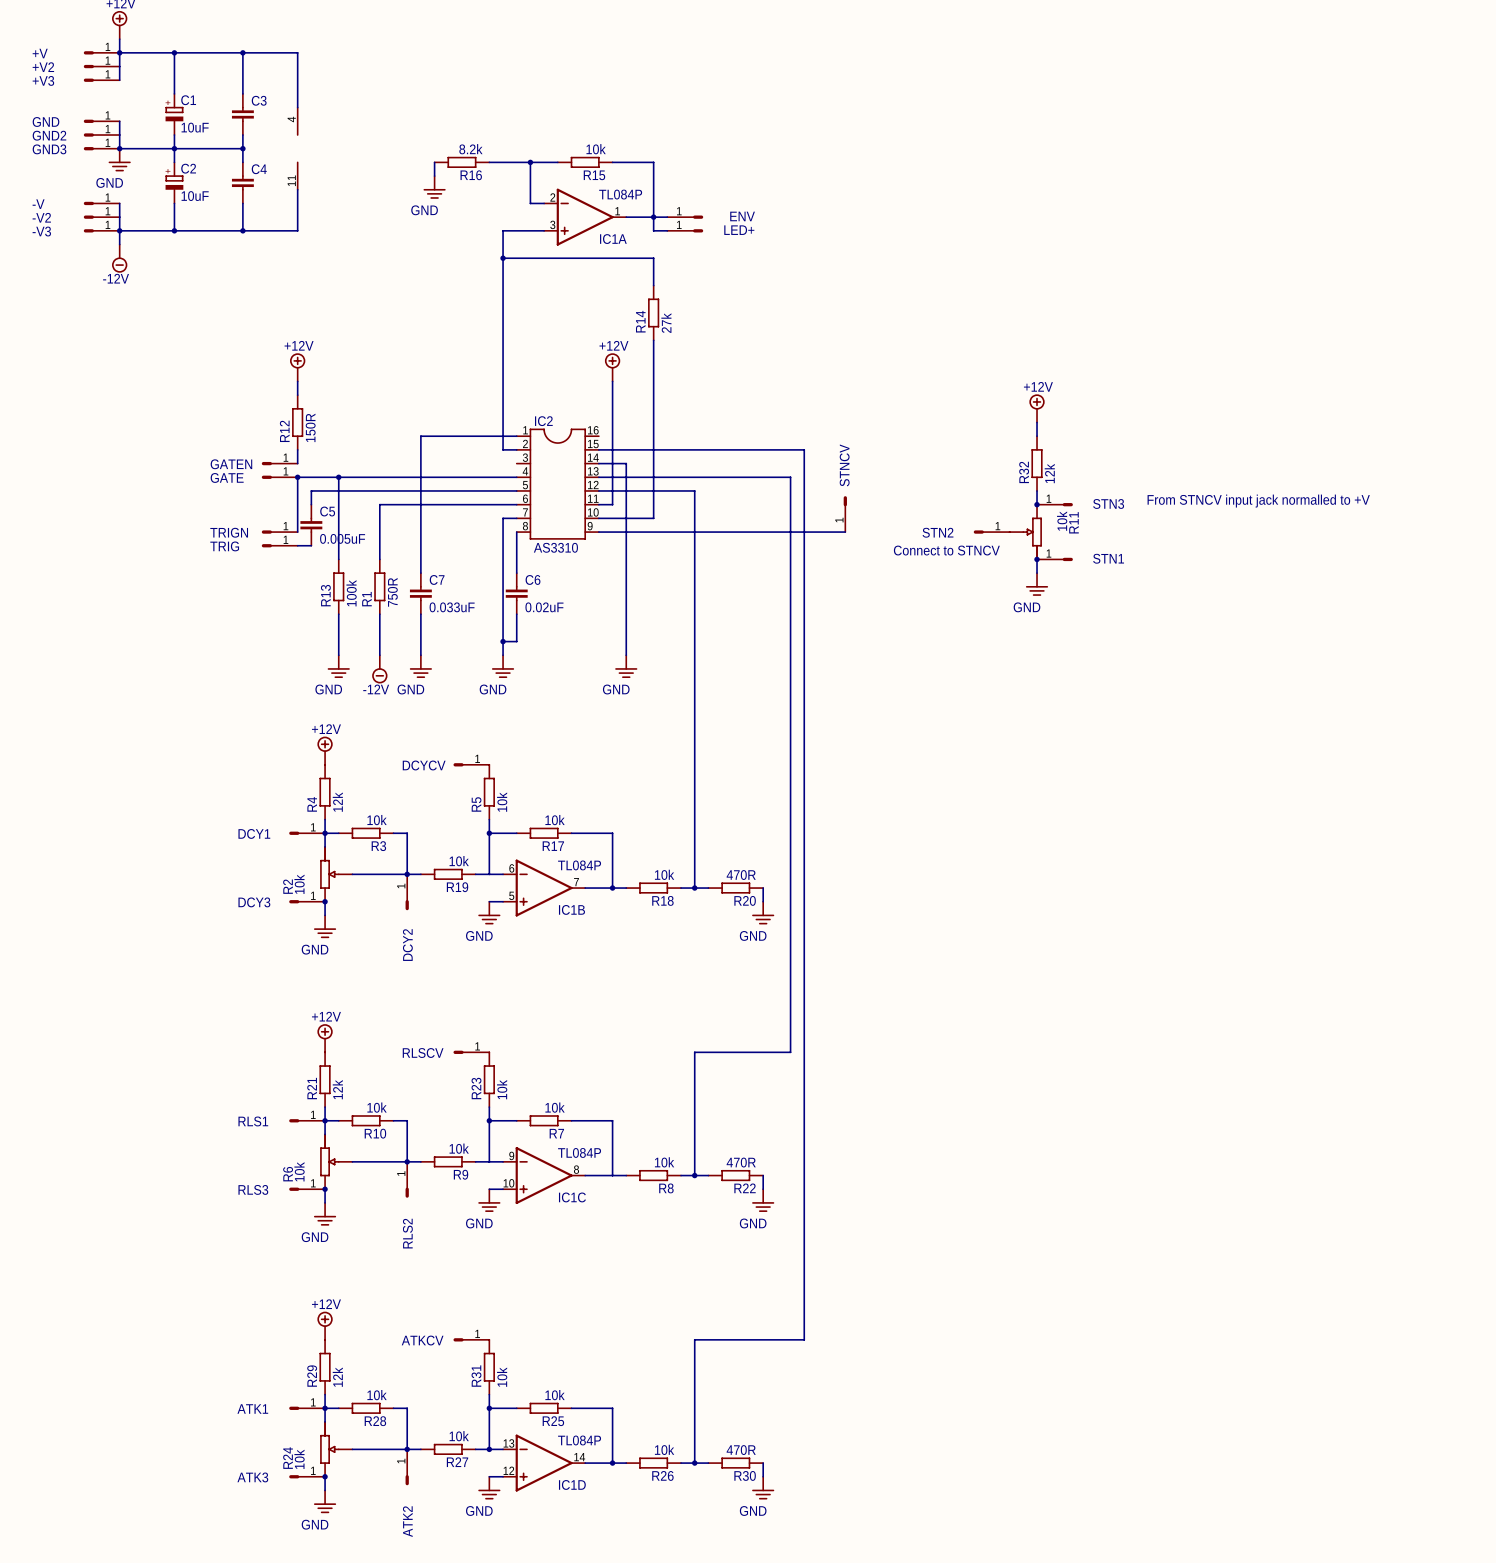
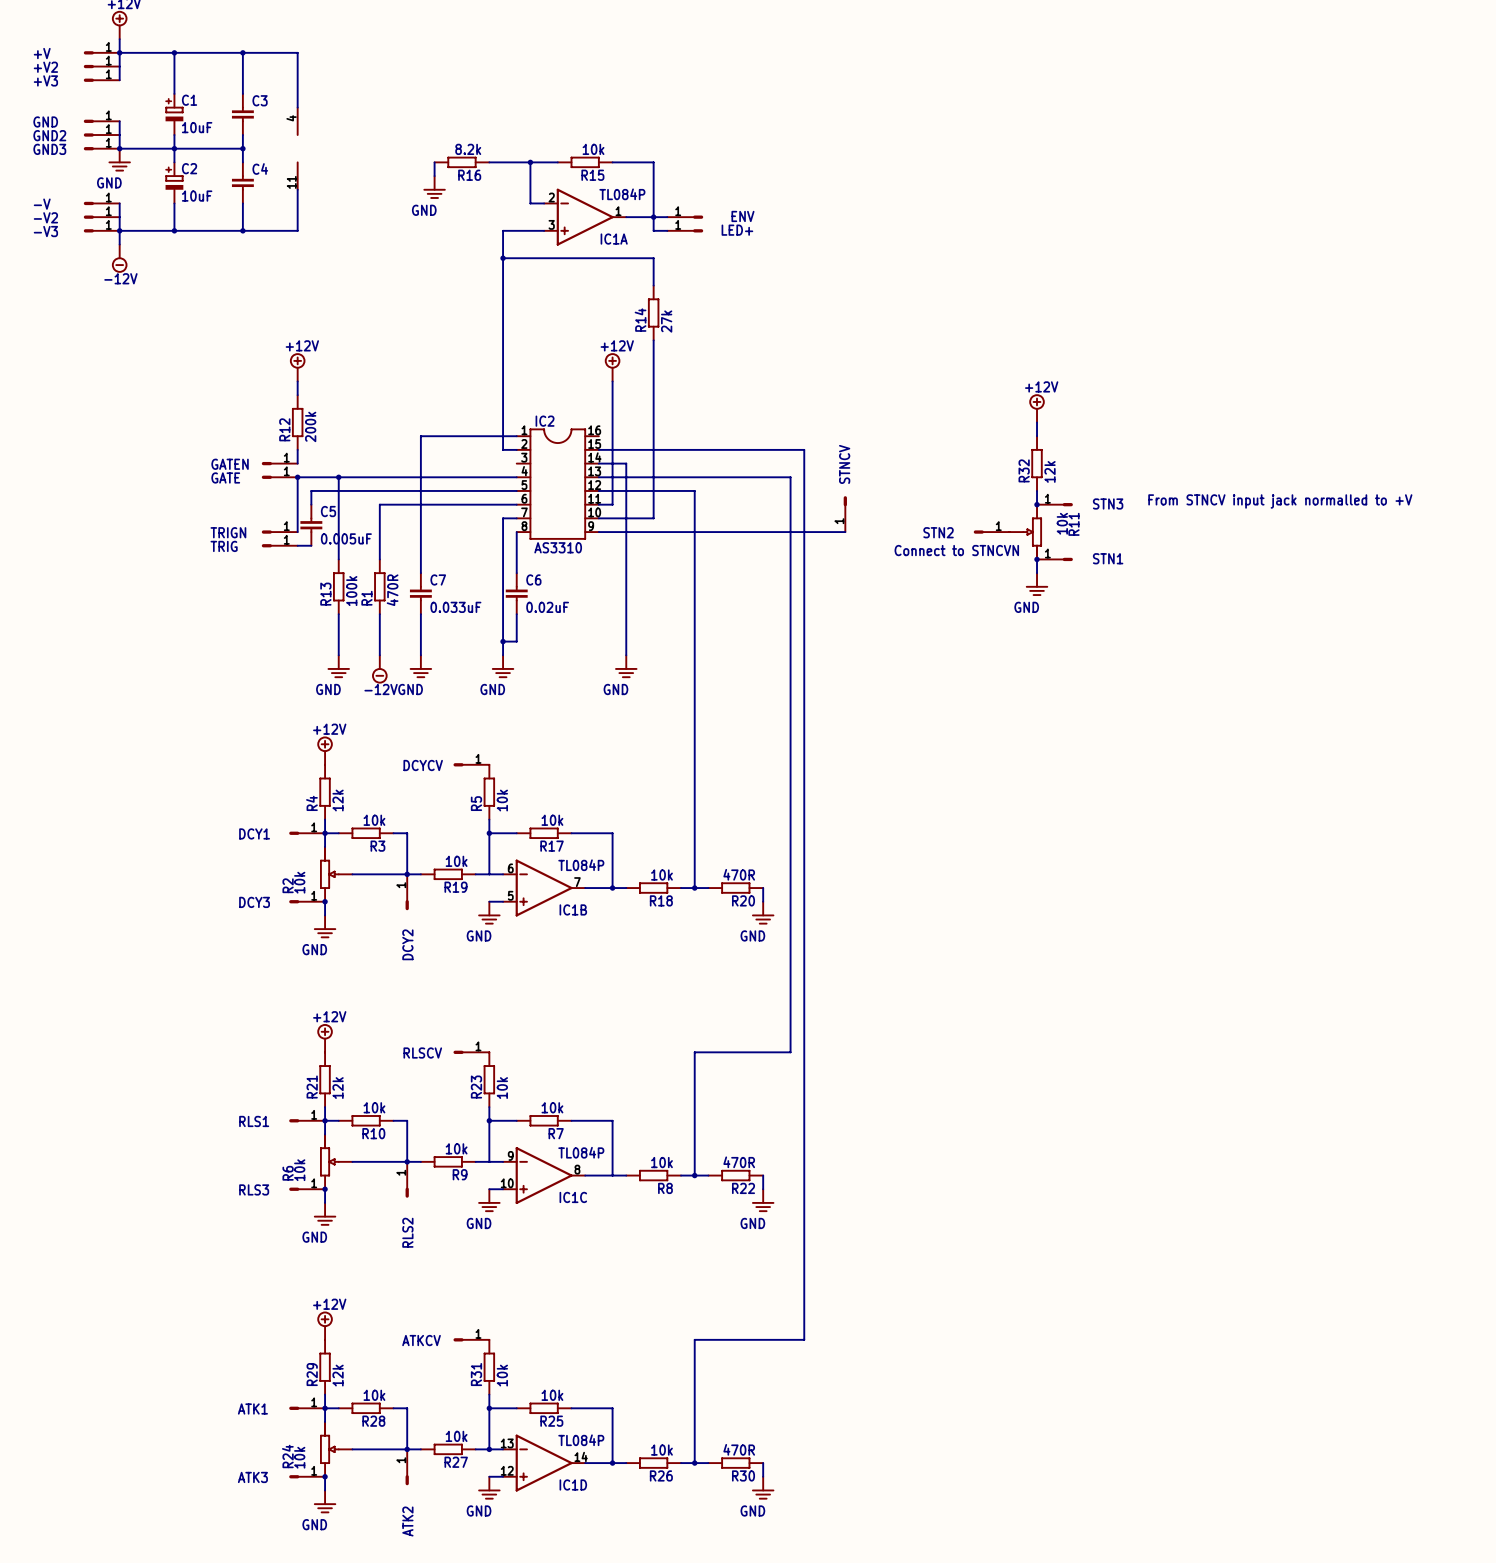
R12 value: 150R (310, 427) -> 200k (310, 426)
text: Connect to STNCV (946, 550) -> Connect to STNCVN (956, 550)
R1 value: 750R (392, 592) -> 470R (392, 590)

